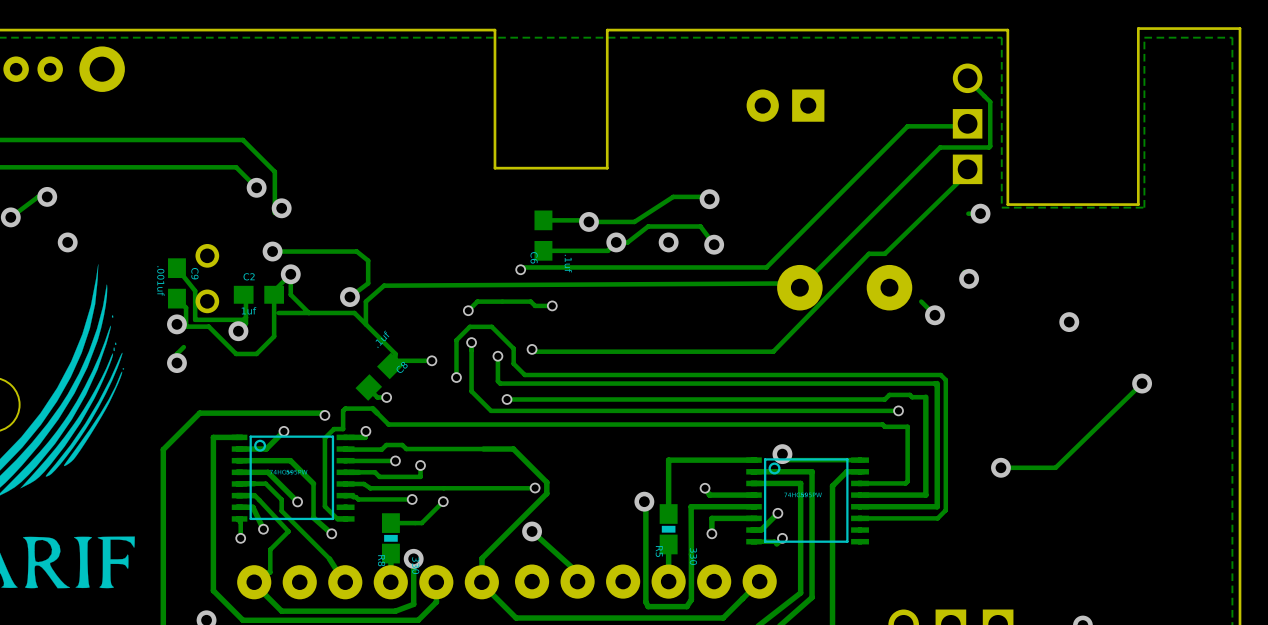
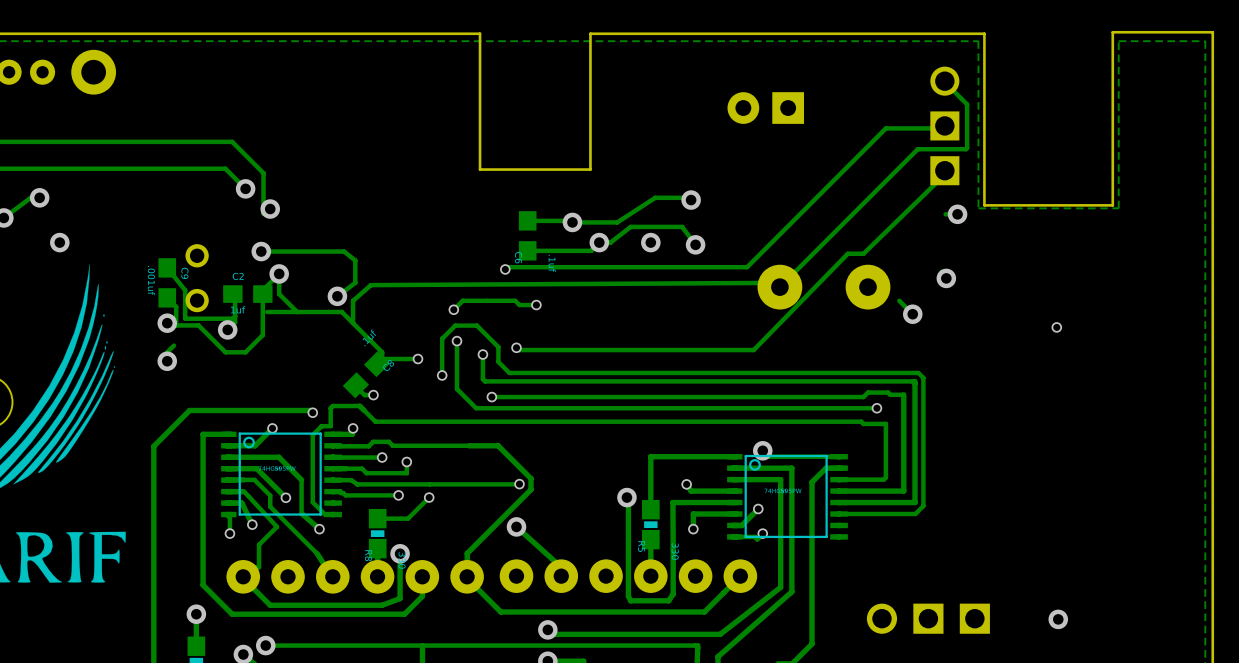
via size: [1059, 312, 1080, 333] -> [1051, 322, 1063, 333]
track: (1142, 383) (1055, 467) (1000, 467) -> none
via: (1142, 383) -> none
via: (1000, 467) -> none

